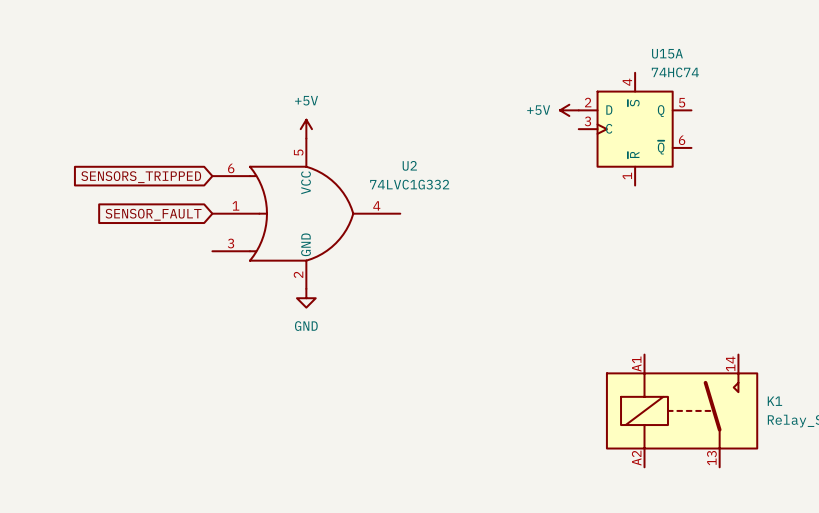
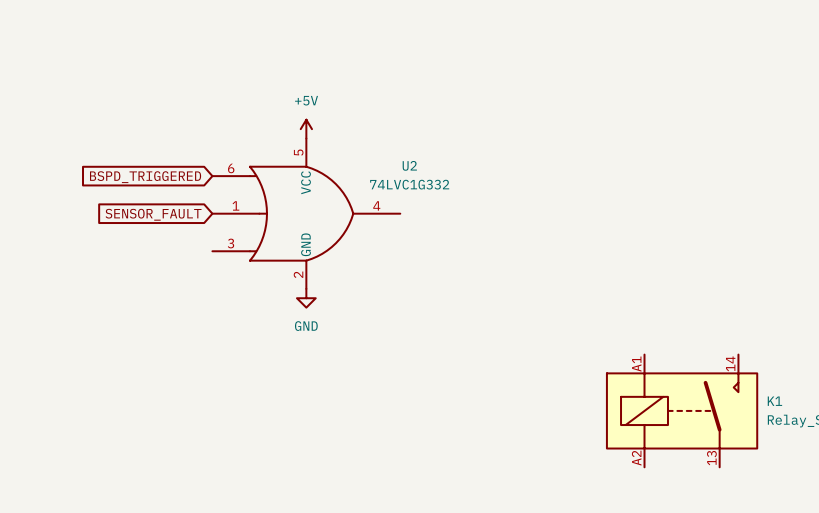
power symbol: +5V (569, 110) -> none
U15A: 74HC74 (635, 129) -> none
global label: SENSORS_TRIPPED (141, 177) -> BSPD_TRIGGERED (145, 177)

